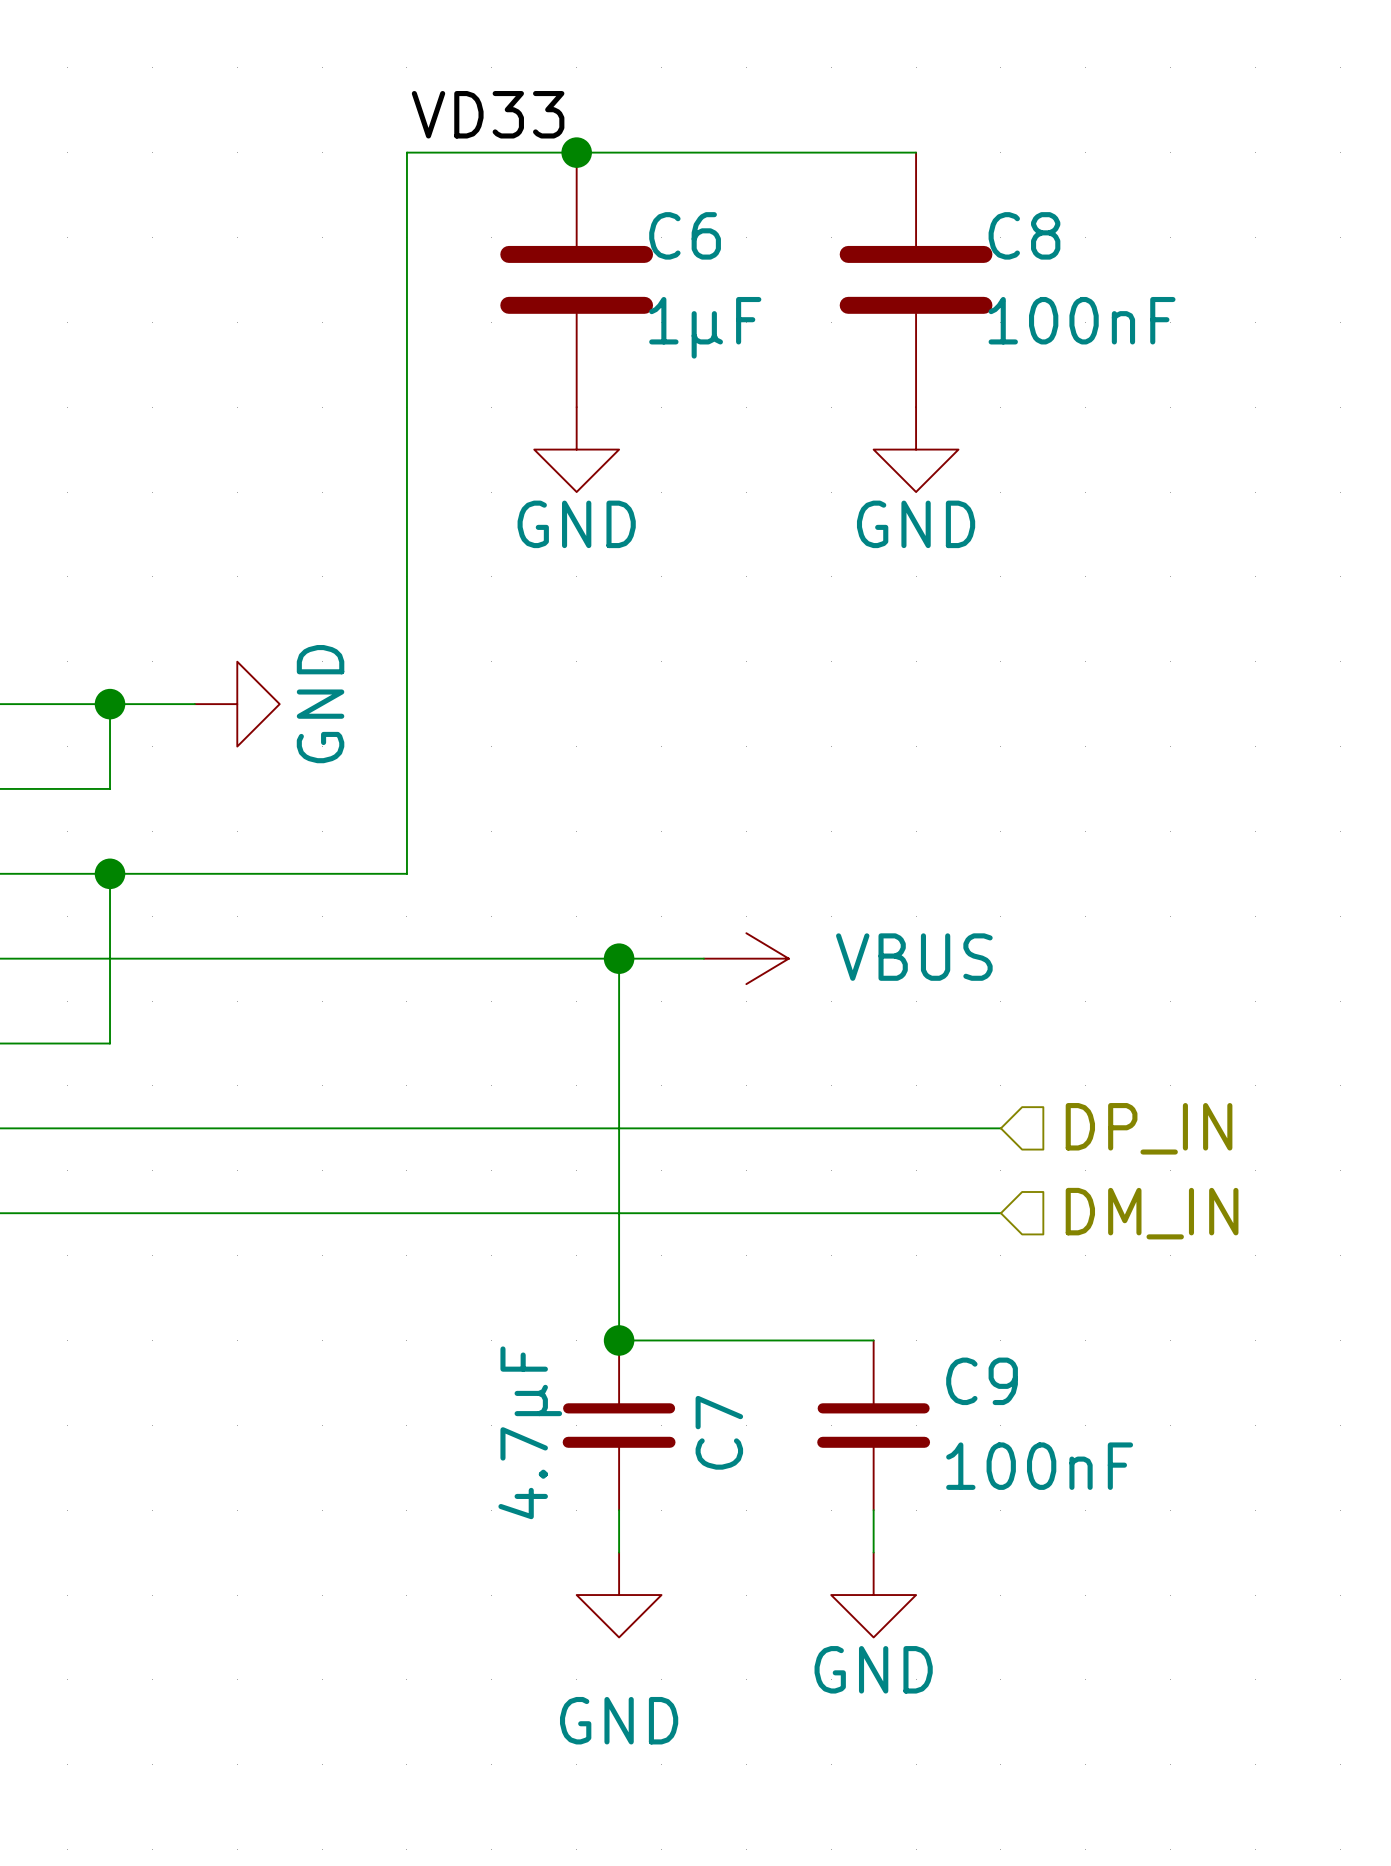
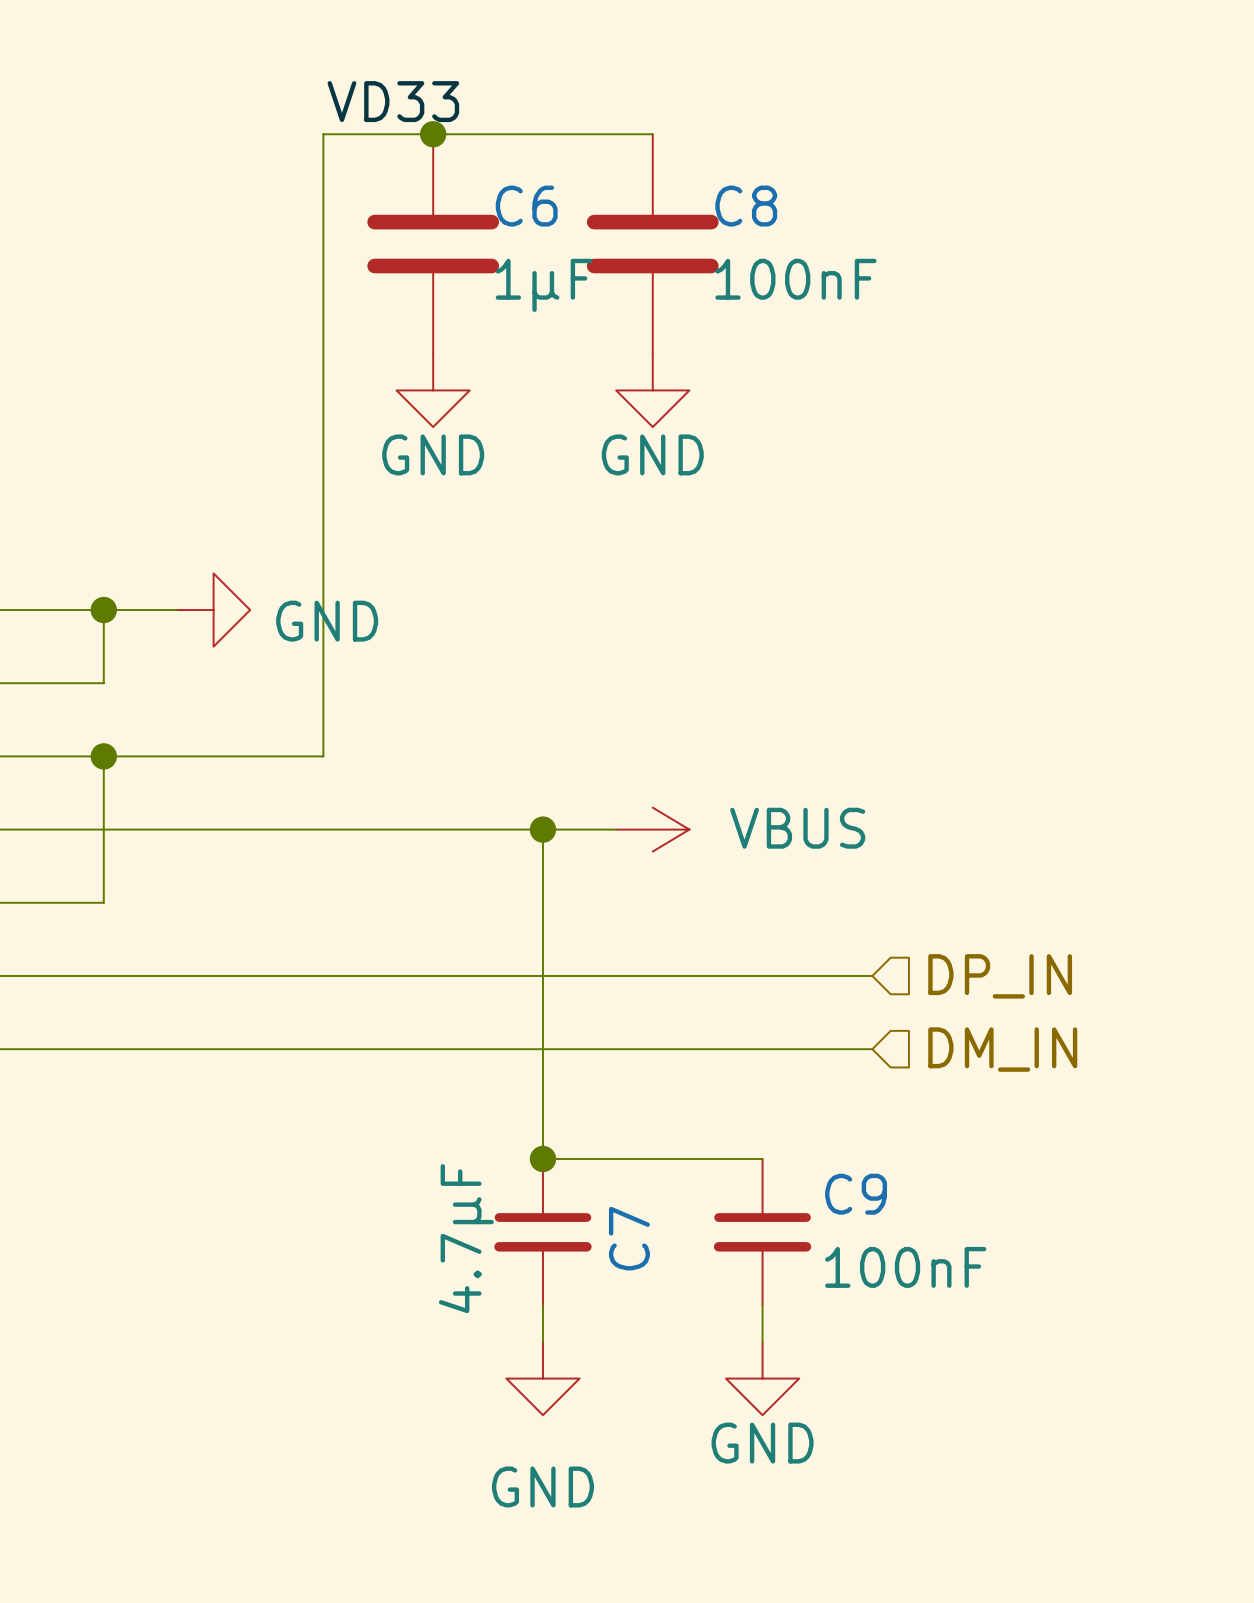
label position: VD33 (488, 114) -> VD33 (393, 101)
wire: (406, 152) (406, 873) (364, 873) -> (359, 134) (323, 134) (323, 756)
junction position: (576, 152) -> (433, 134)
wire: (746, 152) (916, 152) -> none
C6 position: (576, 279) -> (433, 244)
C8 position: (916, 279) -> (652, 244)
power symbol: none -> GND (433, 390)
power symbol: GND (576, 449) -> none
power symbol: none -> GND (652, 390)
power symbol: GND (916, 449) -> none
power symbol text rotation: 0° (320, 704) -> 90° clockwise (327, 621)

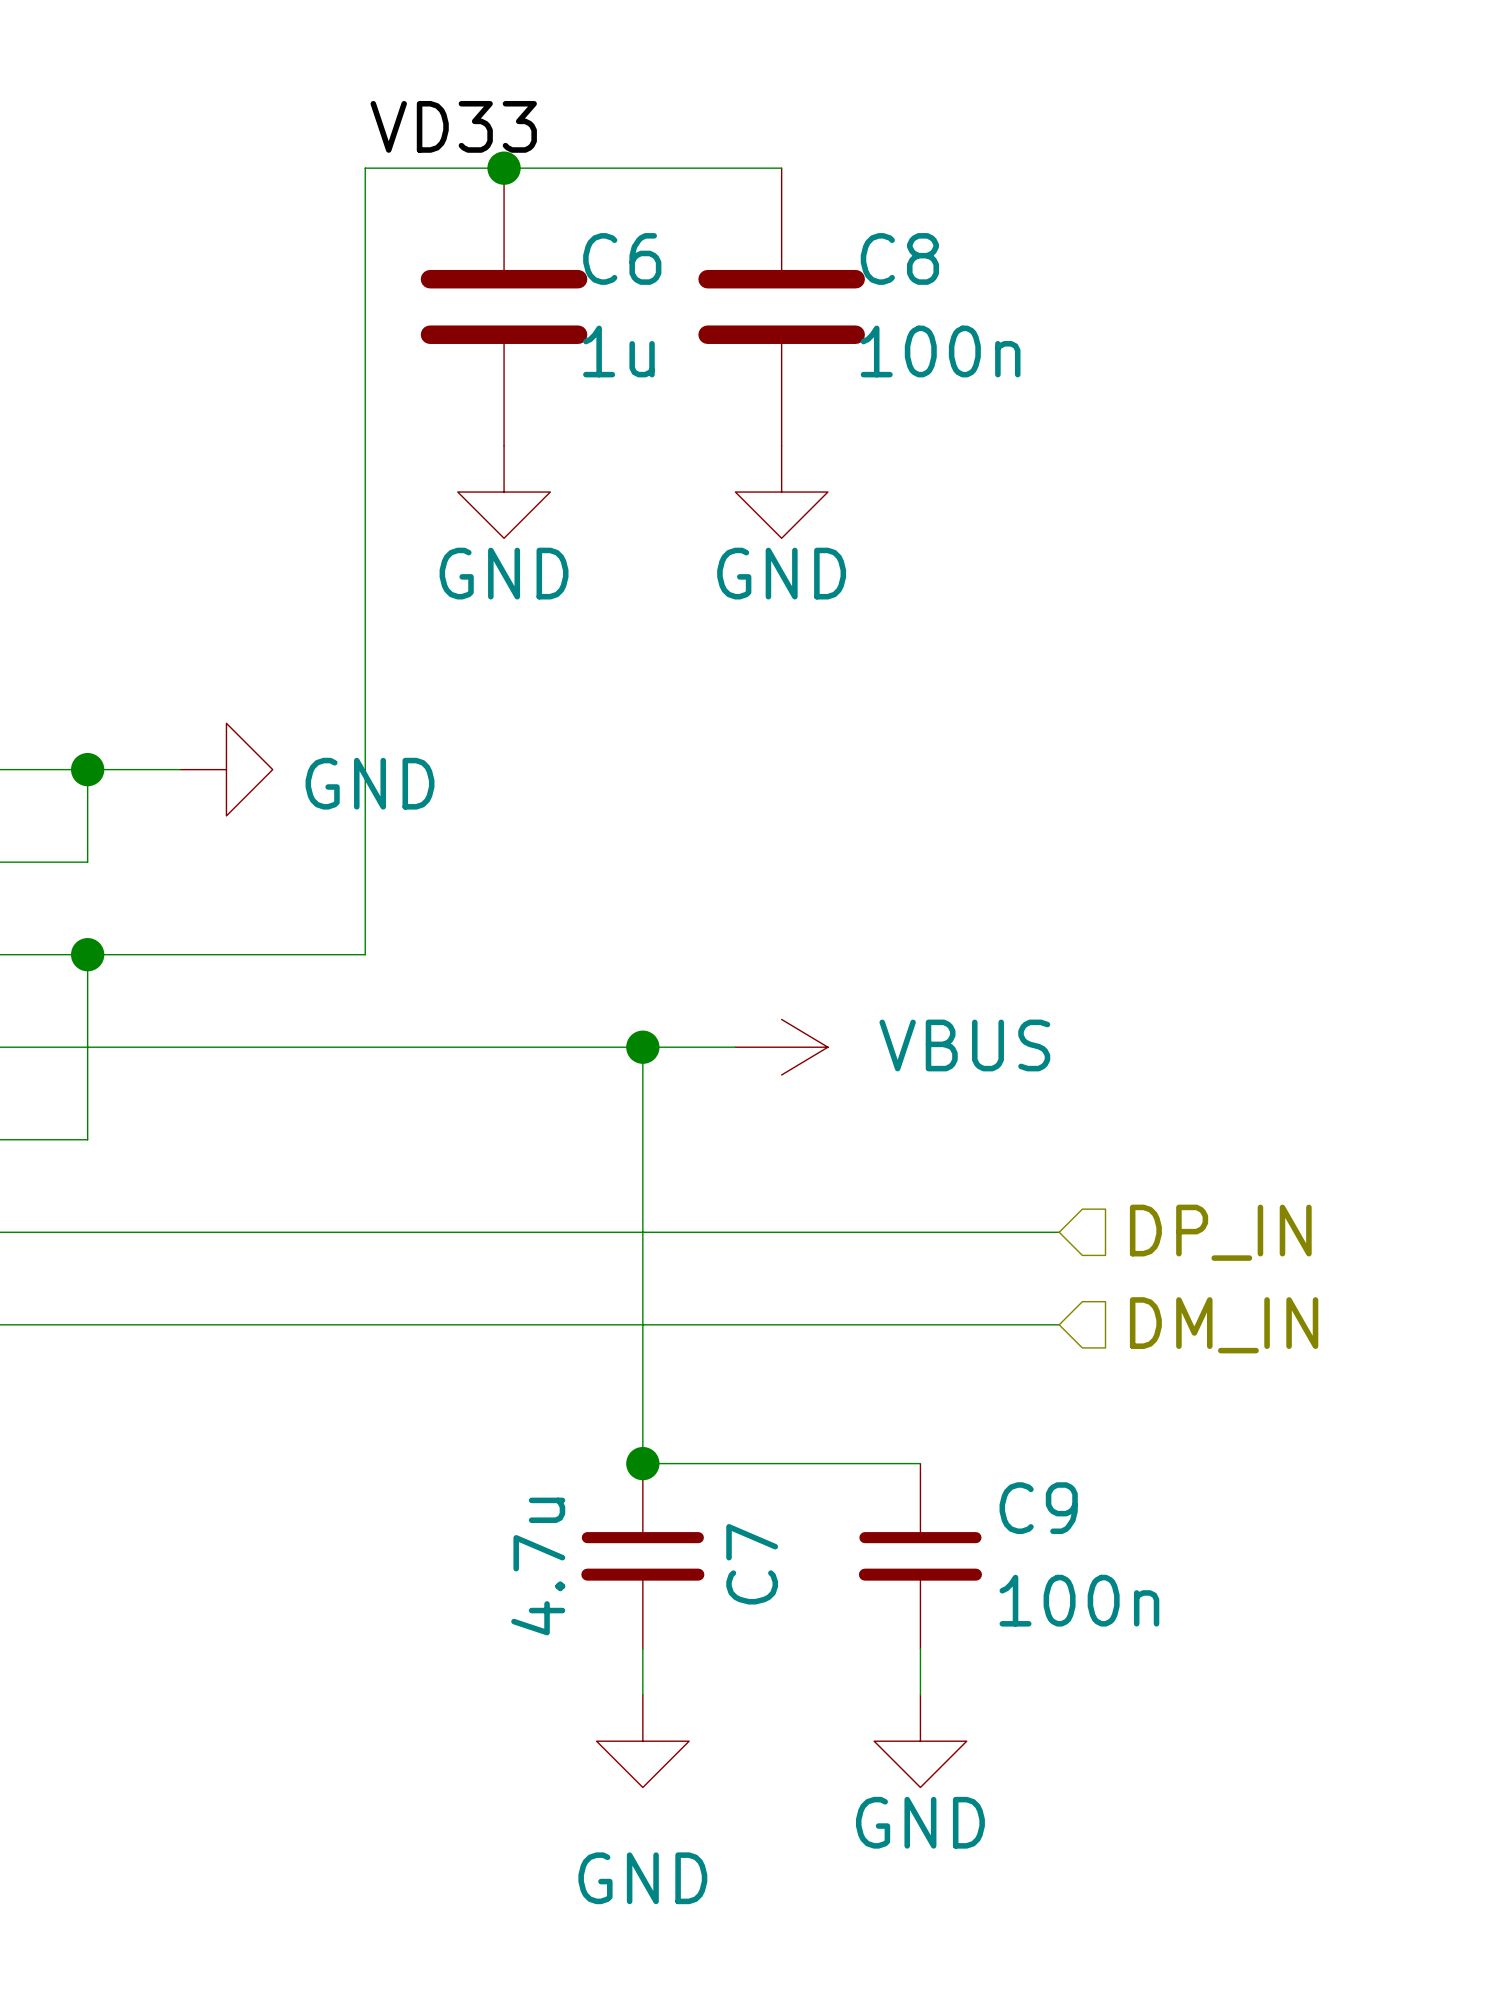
C8 value: 100nF (795, 279) -> 100n (940, 351)
C6 value: 1µF (544, 285) -> 1u (618, 351)
C7 value: 4.7µF (466, 1238) -> 4.7u (538, 1566)
C9 value: 100nF (905, 1267) -> 100n (1079, 1600)

